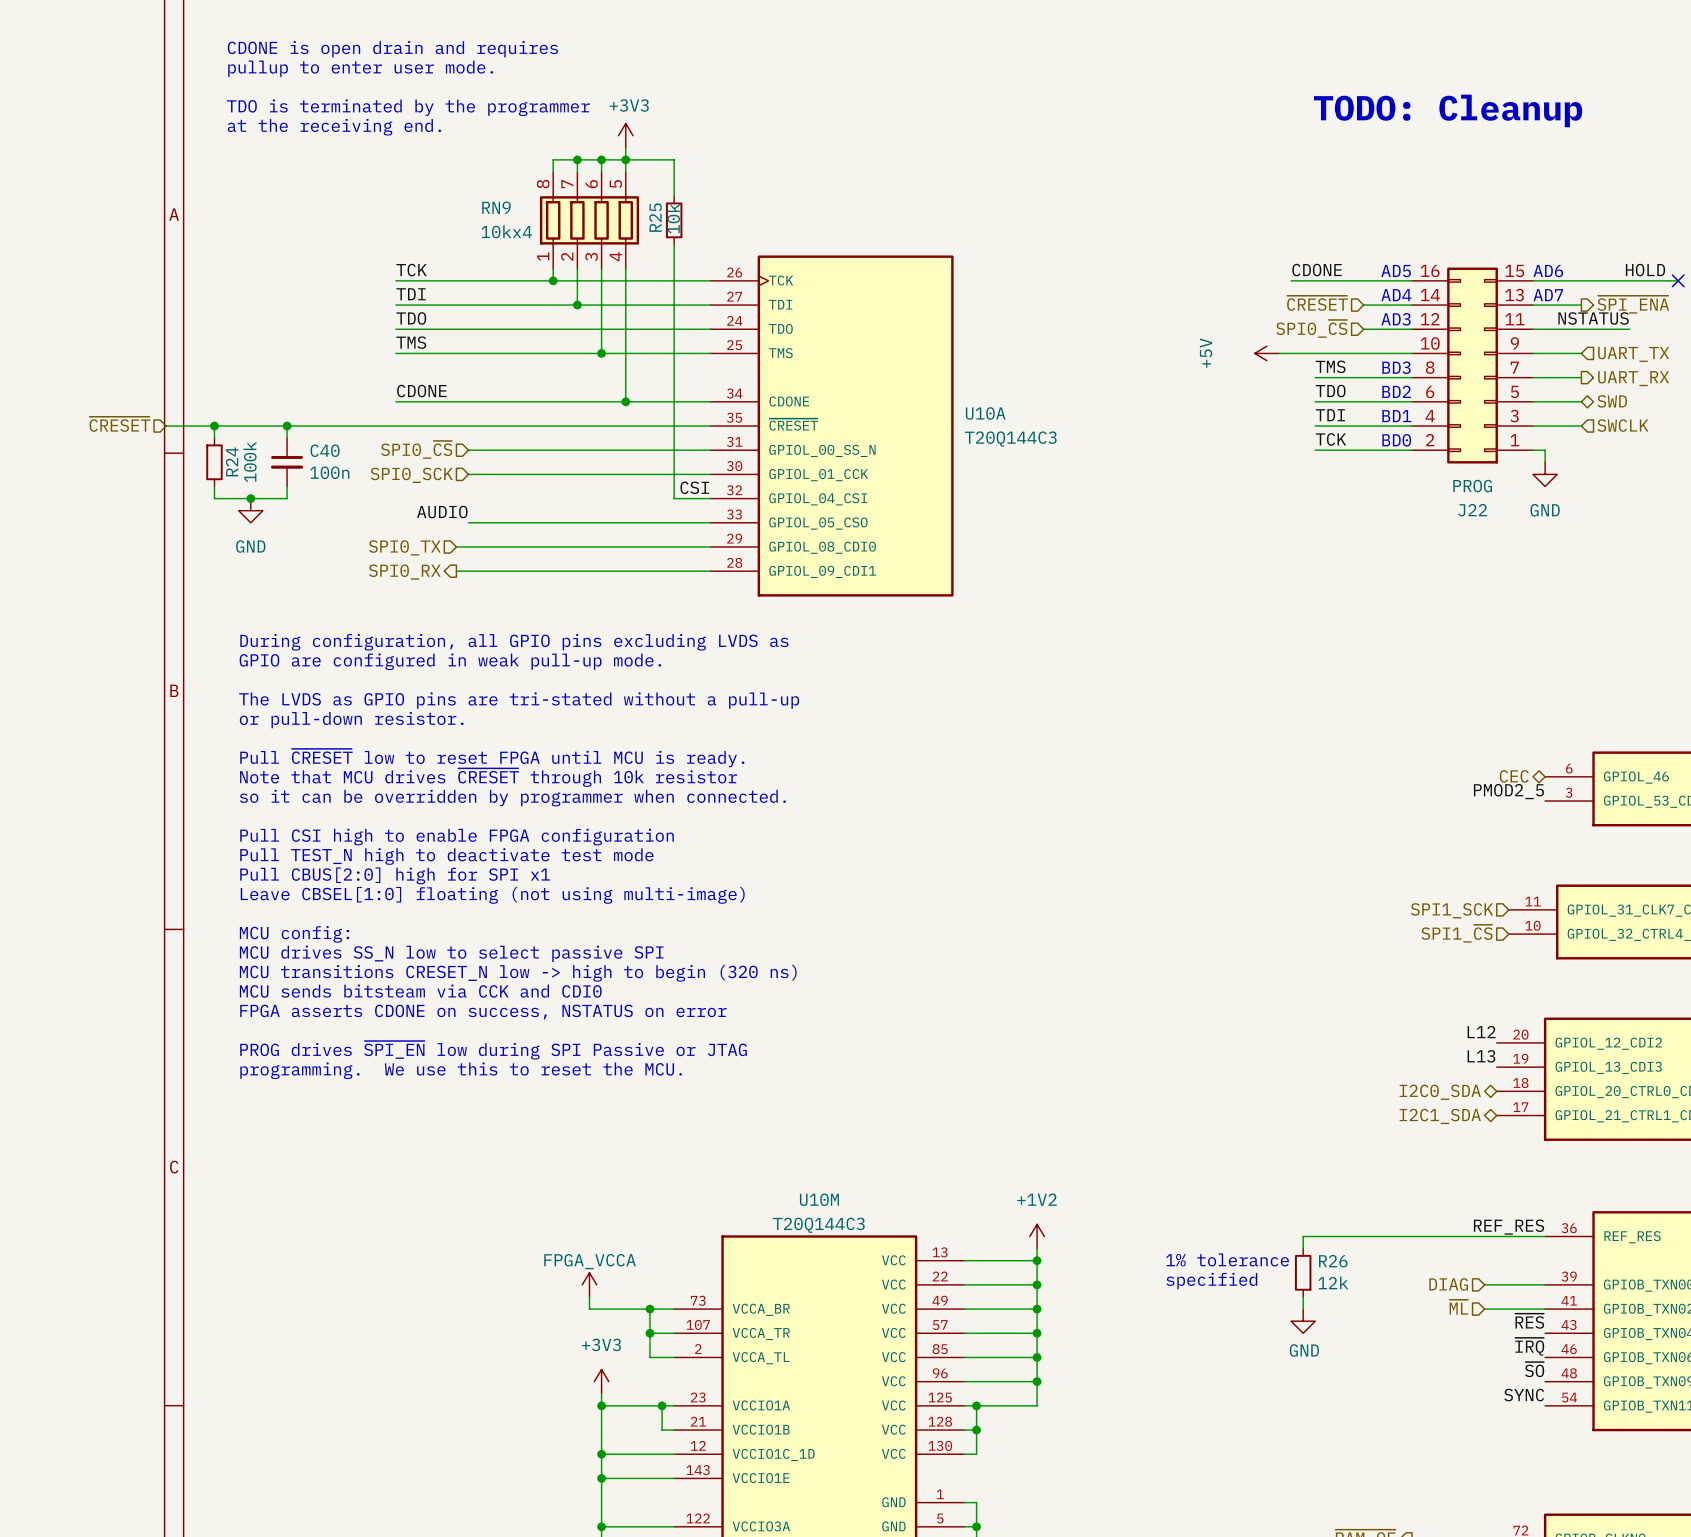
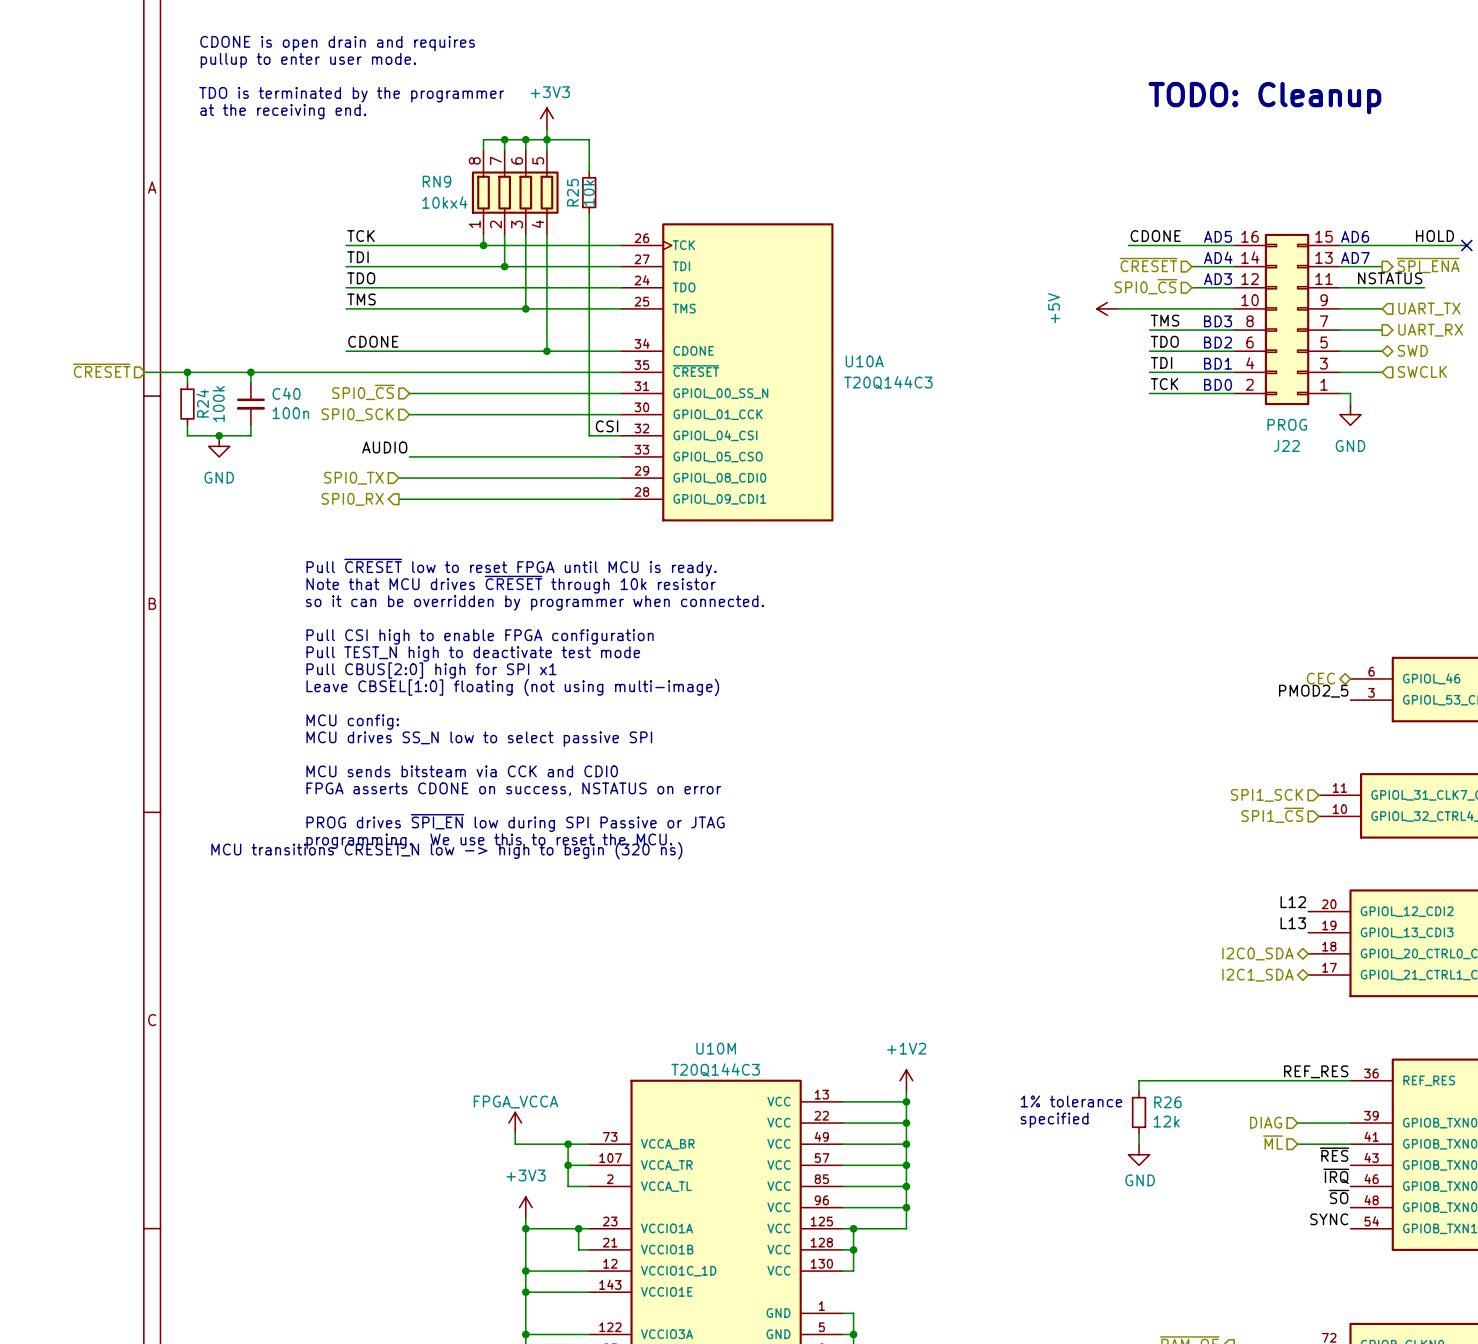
text: During configuration, all GPIO pins excluding LVDS as (514, 642) -> none
text: GPIO are configured in weak pull-up mode. (450, 661) -> none
text: The LVDS as GPIO pins are tri-stated without a pull-up (519, 700) -> none
text: or pull-down resistor. (351, 720) -> none
text position: Pull ~{CRESET} low to reset FPGA until MCU is ready. (492, 758) -> Pull ~{CRESET} low to reset FPGA until MCU is ready. (511, 567)
text position: Note that MCU drives ~{CRESET} through 10k resistor (488, 777) -> Note that MCU drives ~{CRESET} through 10k resistor (511, 584)
text position: so it can be overridden by programmer when connected. (512, 798) -> so it can be overridden by programmer when connected. (534, 602)
text position: Pull CSI high to enable FPGA configuration (457, 837) -> Pull CSI high to enable FPGA configuration (480, 636)
text position: Pull TEST_N high to deactivate test mode (446, 856) -> Pull TEST_N high to deactivate test mode (473, 653)
text position: Pull CBUS[2:0] high for SPI x1 (395, 875) -> Pull CBUS[2:0] high for SPI x1 (431, 670)
text position: Leave CBSEL[1:0] floating (not using multi-image) (492, 895) -> Leave CBSEL[1:0] floating (not using multi-image) (512, 687)
text position: MCU config: (294, 934) -> MCU config: (352, 722)
text position: MCU drives SS_N low to select passive SPI (451, 953) -> MCU drives SS_N low to select passive SPI (479, 739)
text position: MCU sends bitsteam via CCK and CDI0 (420, 991) -> MCU sends bitsteam via CCK and CDI0 (462, 771)
text position: FPGA asserts CDONE on success, NSTATUS on error (483, 1012) -> FPGA asserts CDONE on success, NSTATUS on error (513, 789)
text position: PROG drives ~{SPI_EN} low during SPI Passive or JTAG (493, 1050) -> PROG drives ~{SPI_EN} low during SPI Passive or JTAG (515, 823)
text position: programming. We use this to reset the MCU. (461, 1070) -> programming. We use this to reset the MCU. (489, 841)

